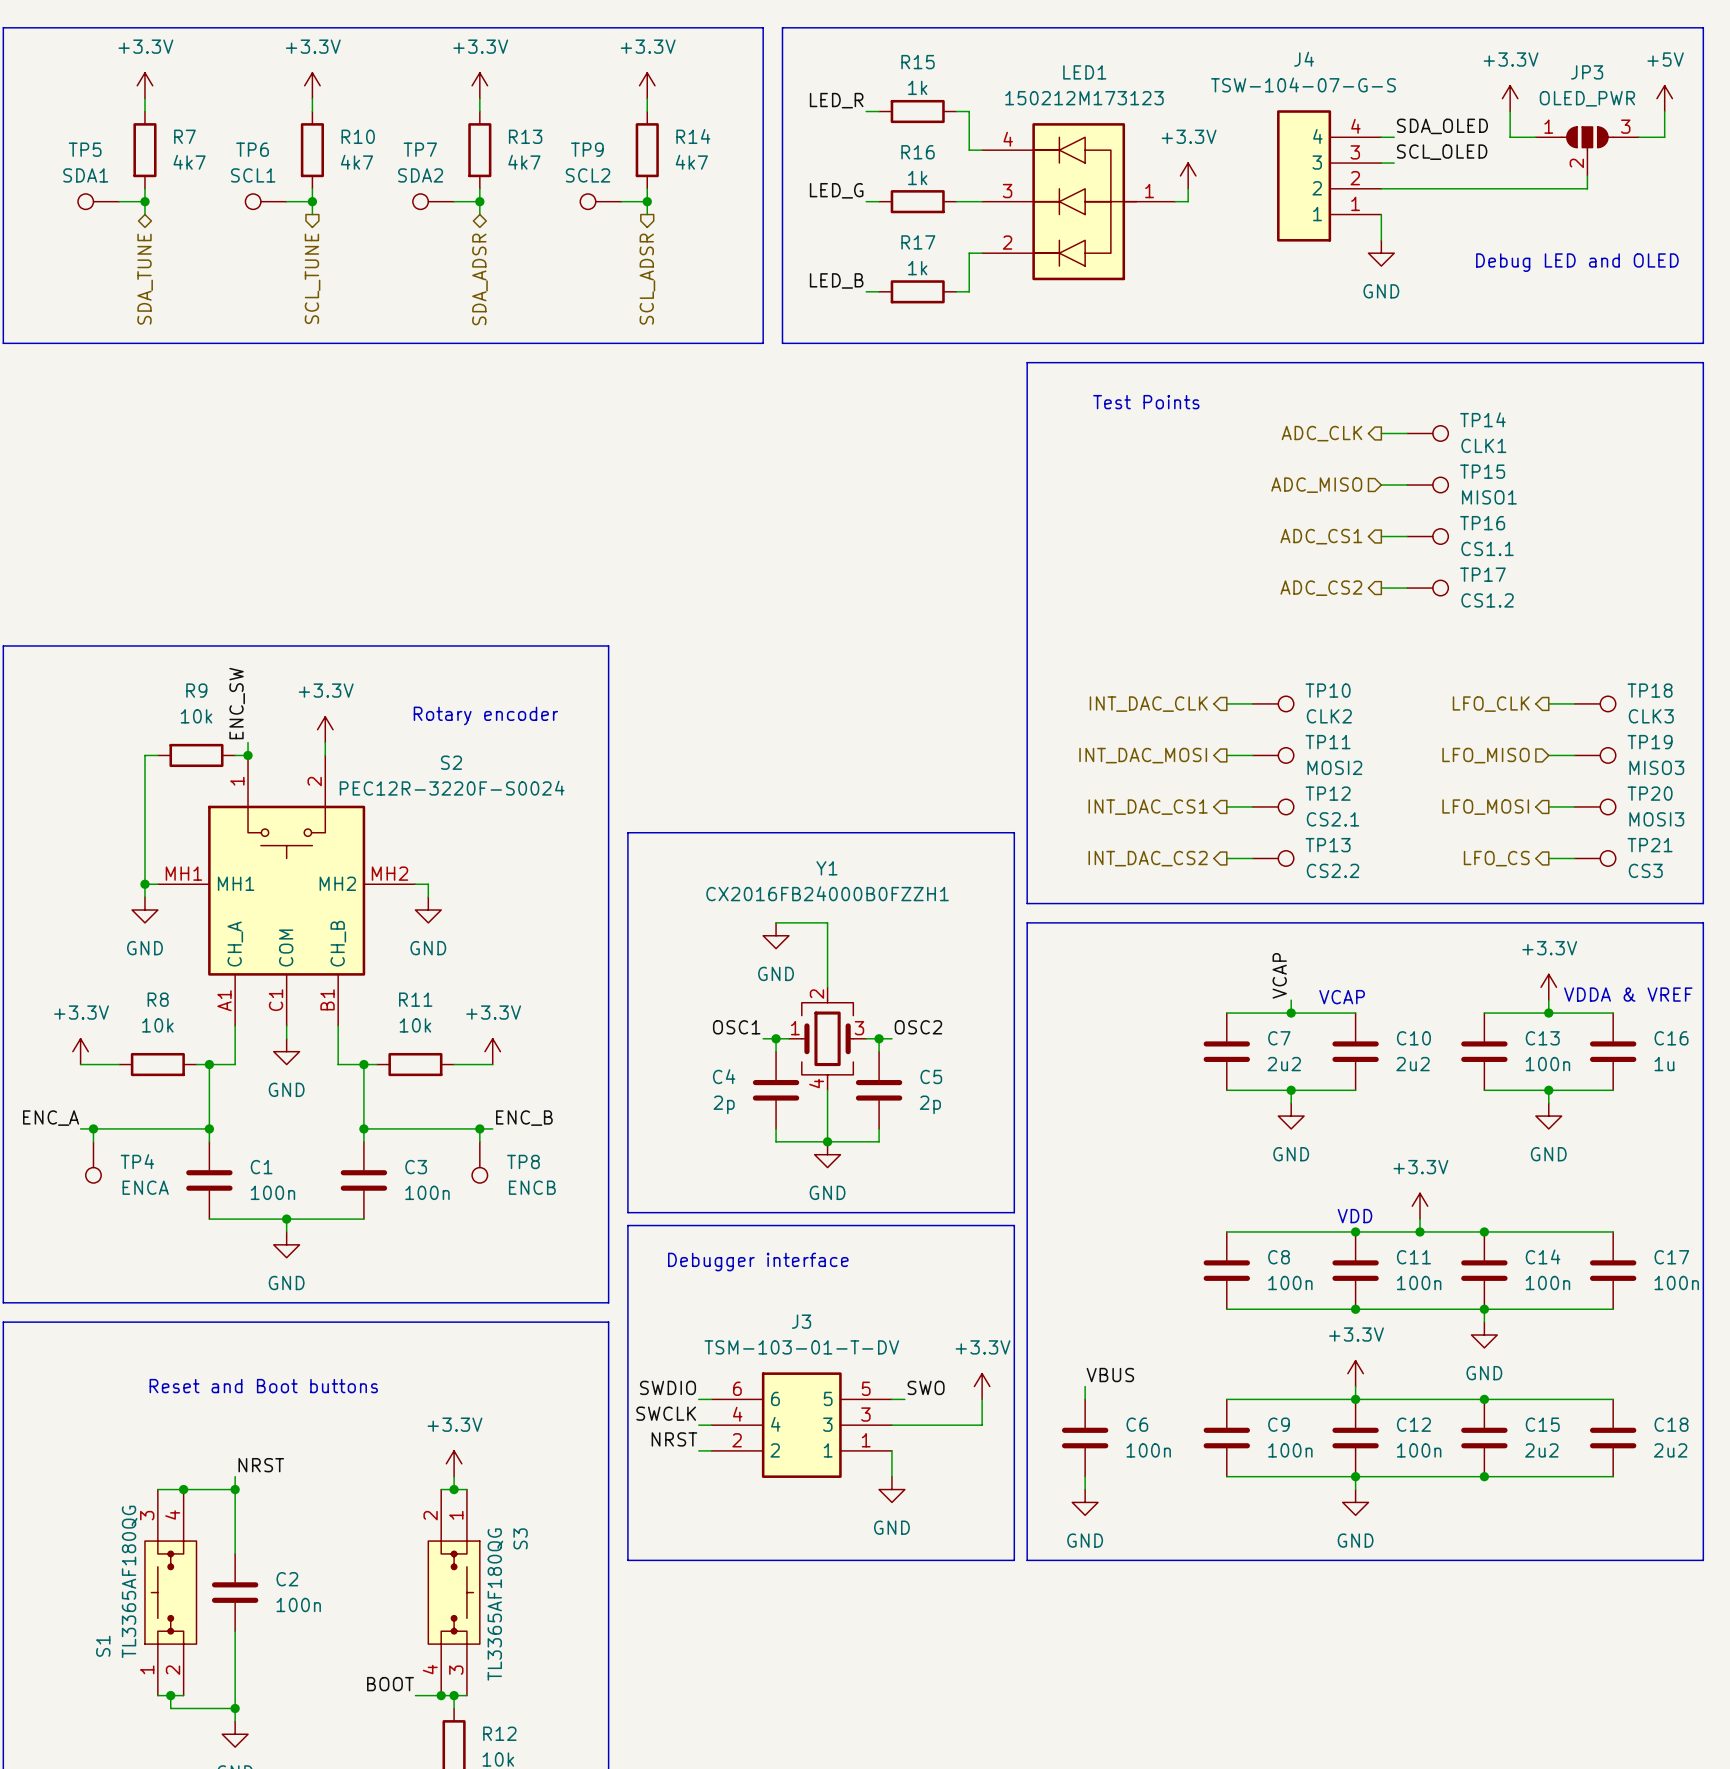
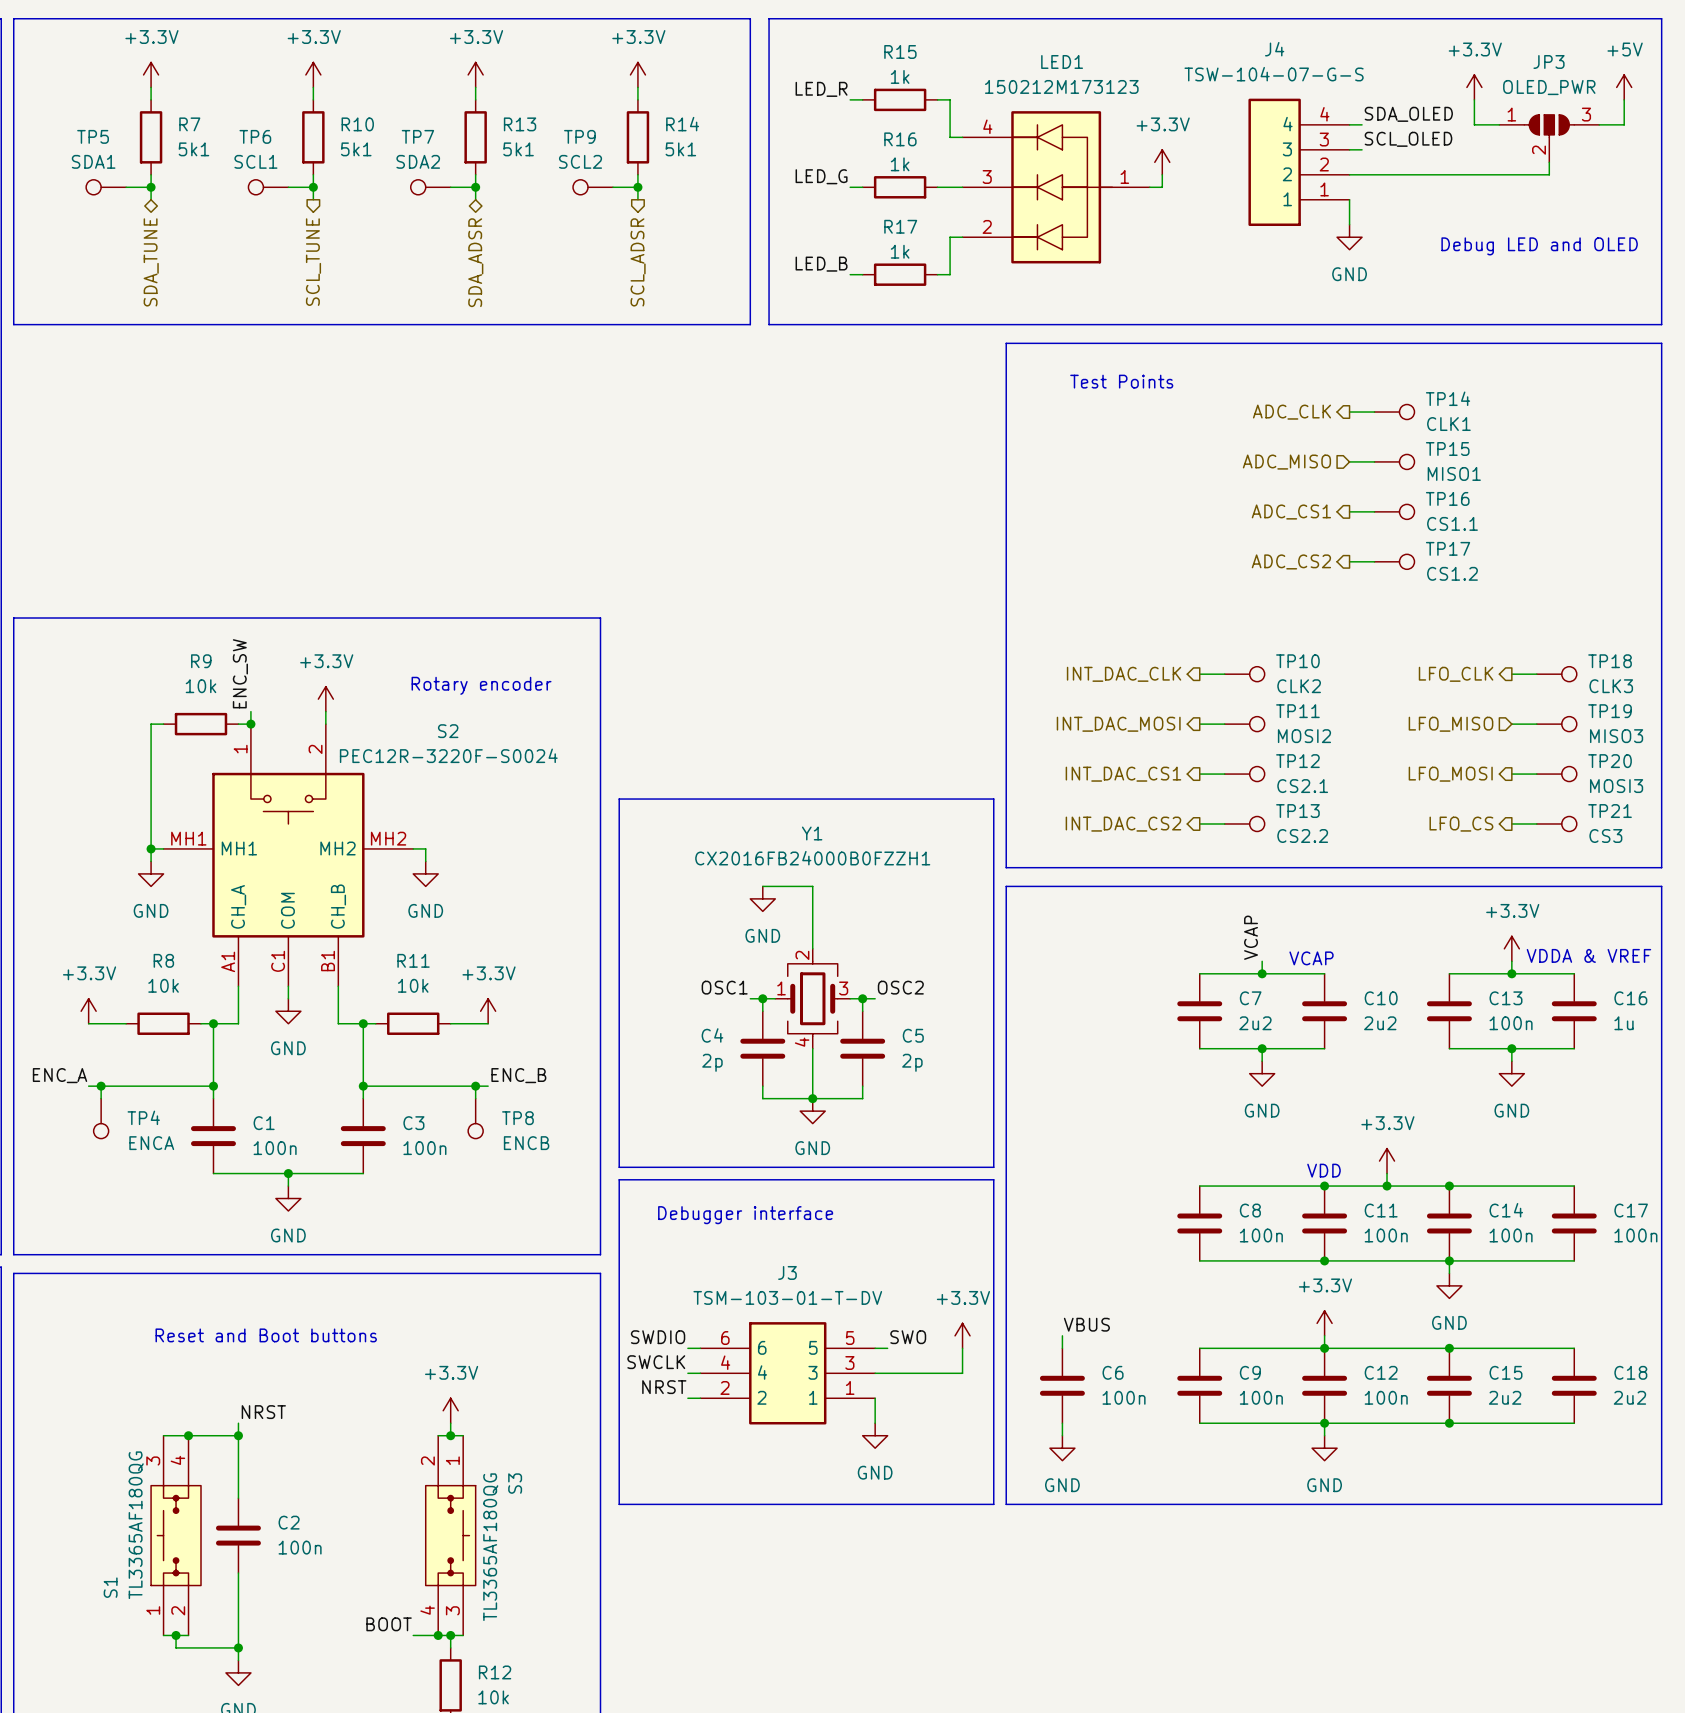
R7 value: 4k7 (189, 162) -> 5k1 (193, 149)
R10 value: 4k7 (356, 162) -> 5k1 (356, 149)
R13 value: 4k7 (524, 162) -> 5k1 (518, 149)
R14 value: 4k7 (691, 162) -> 5k1 (680, 149)

